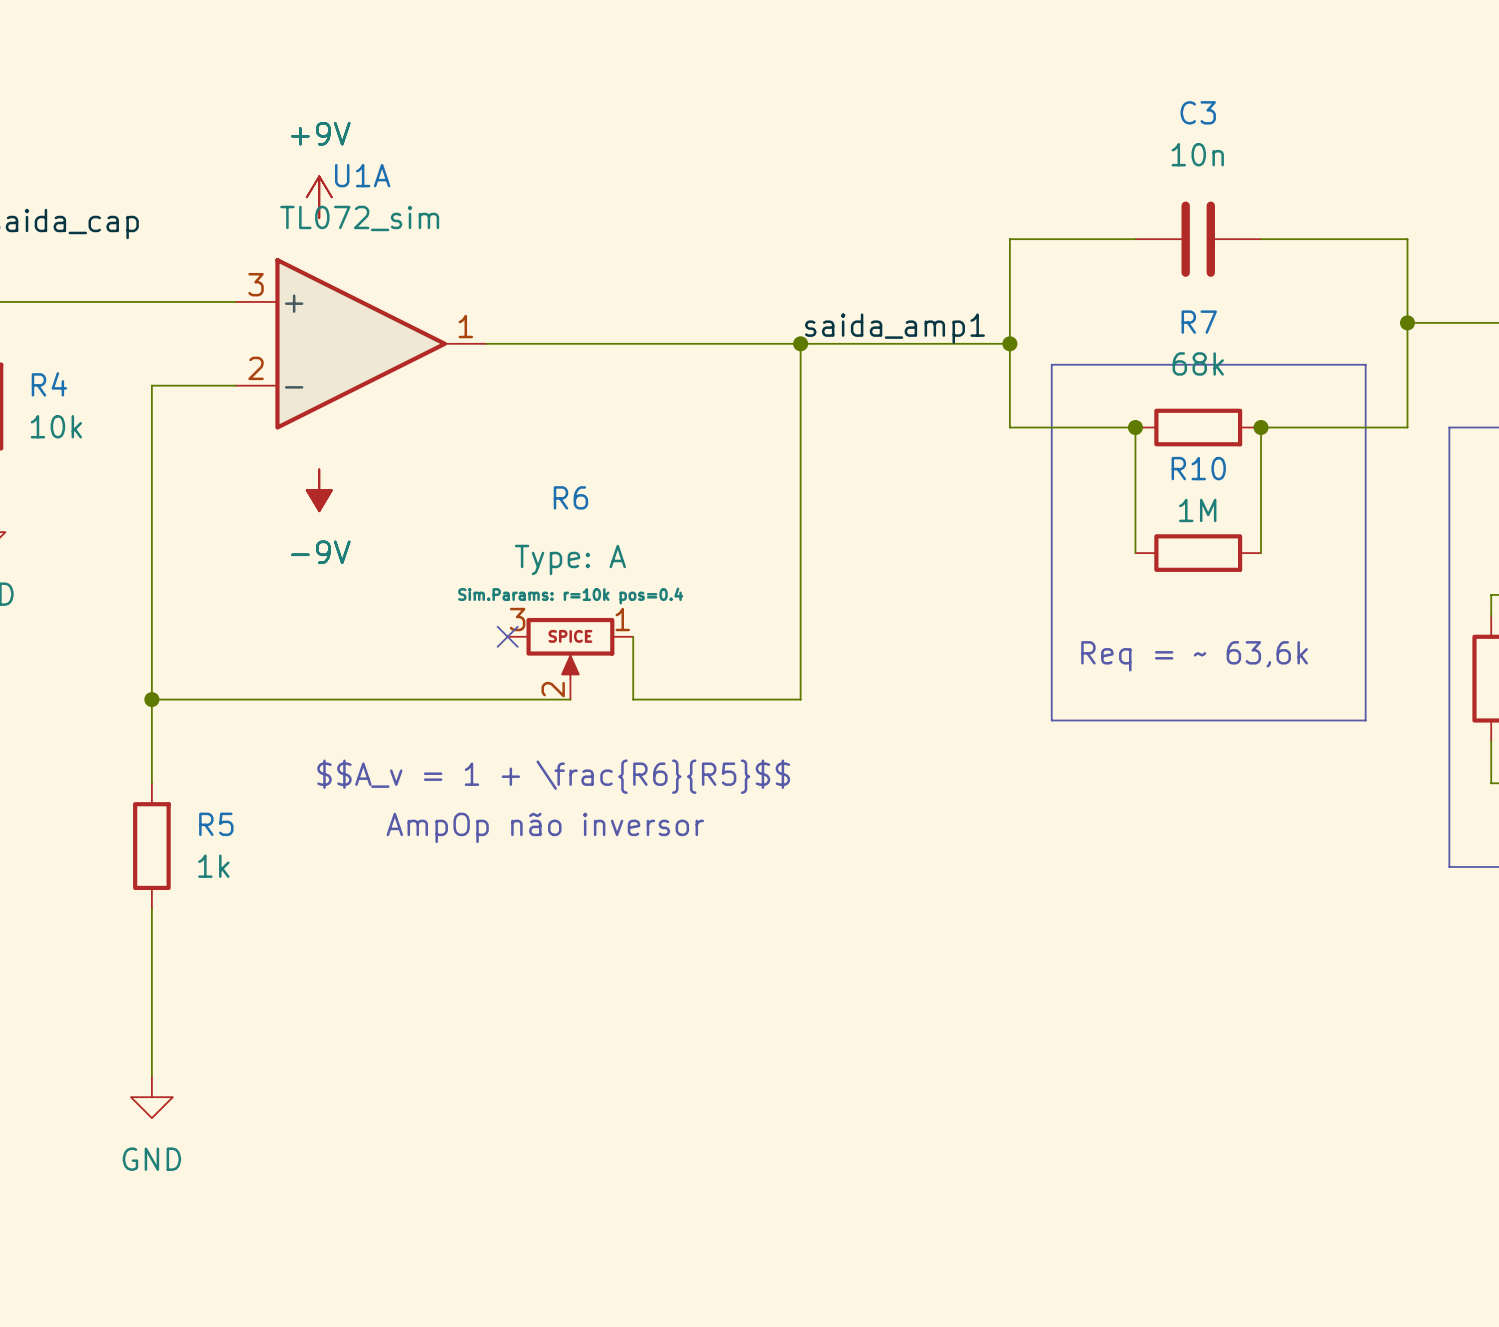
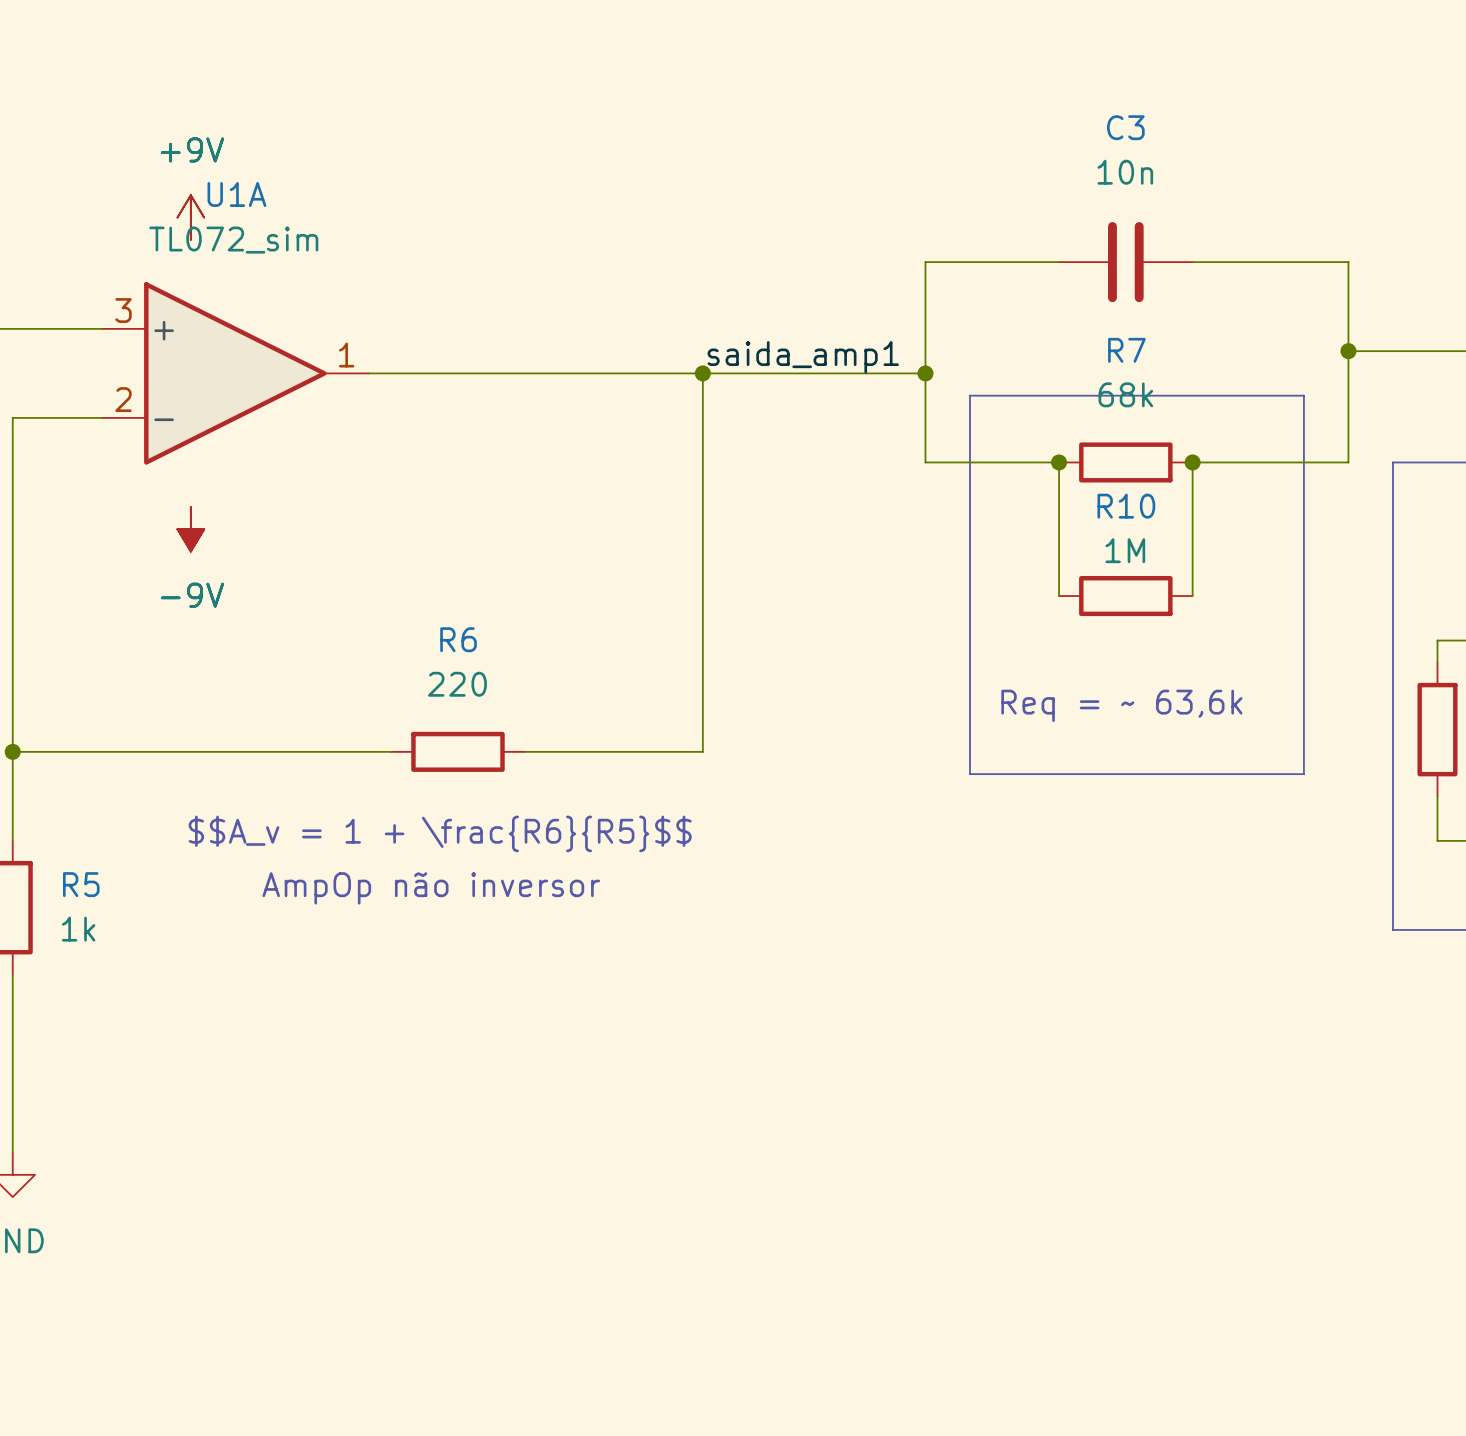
R6 name position: R6 (570, 497) -> R6 (458, 639)
R6 text: Type: A (570, 559) -> none
R6 text: Sim.Params: r=10k pos=0.4 (570, 596) -> none
R6 symbol: [507, 617, 634, 700] -> [391, 731, 525, 772]
no-connect mark: (507, 636) -> none
R6 value: none -> 220 (457, 684)
wire: (633, 636) (633, 699) -> none
wire: (507, 699) (570, 699) -> none

